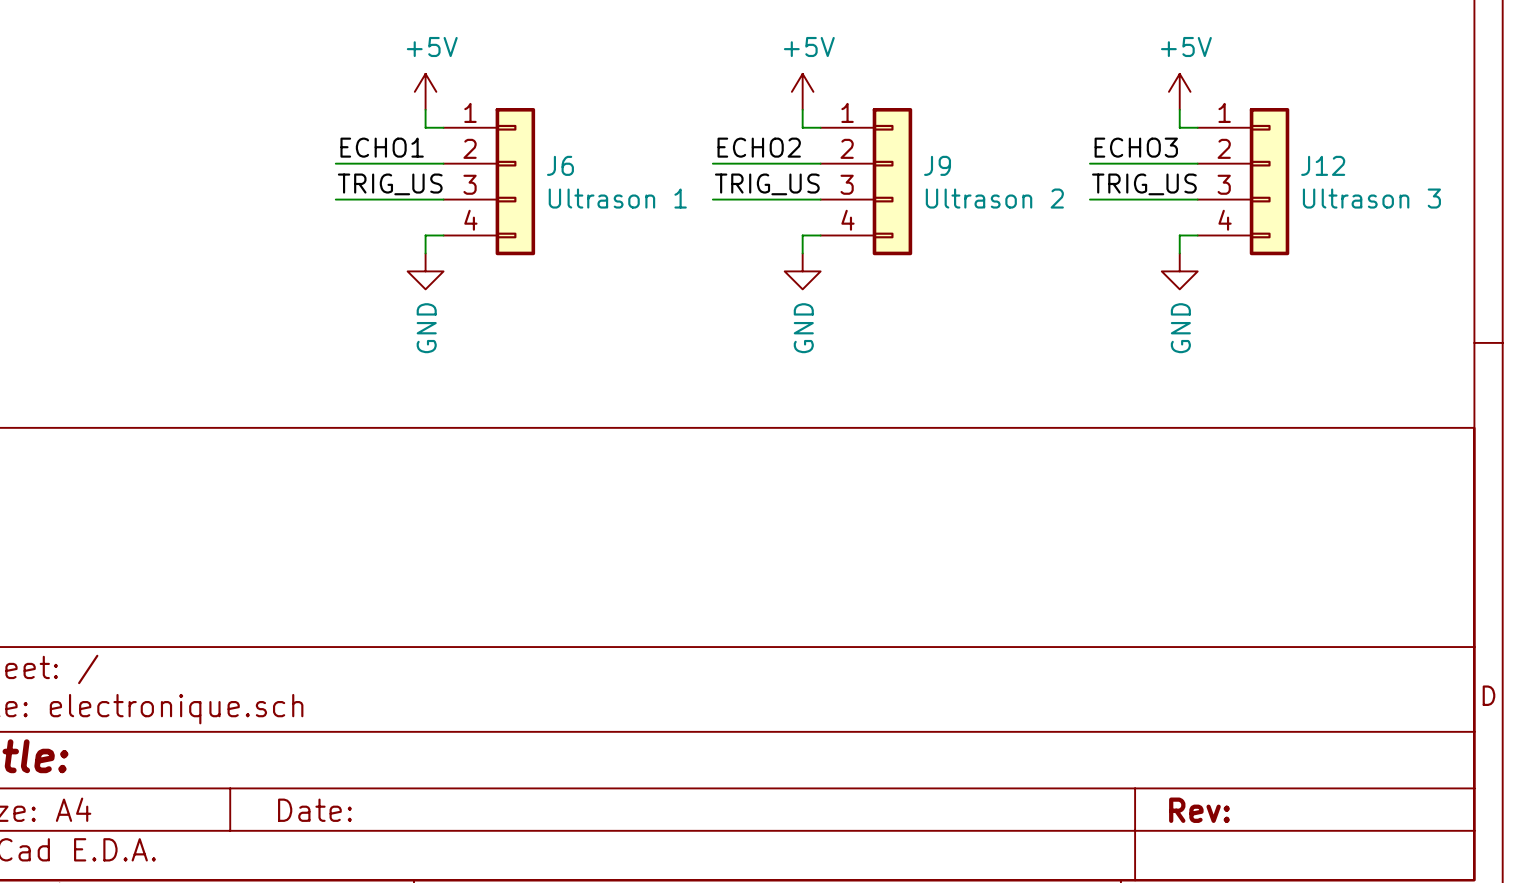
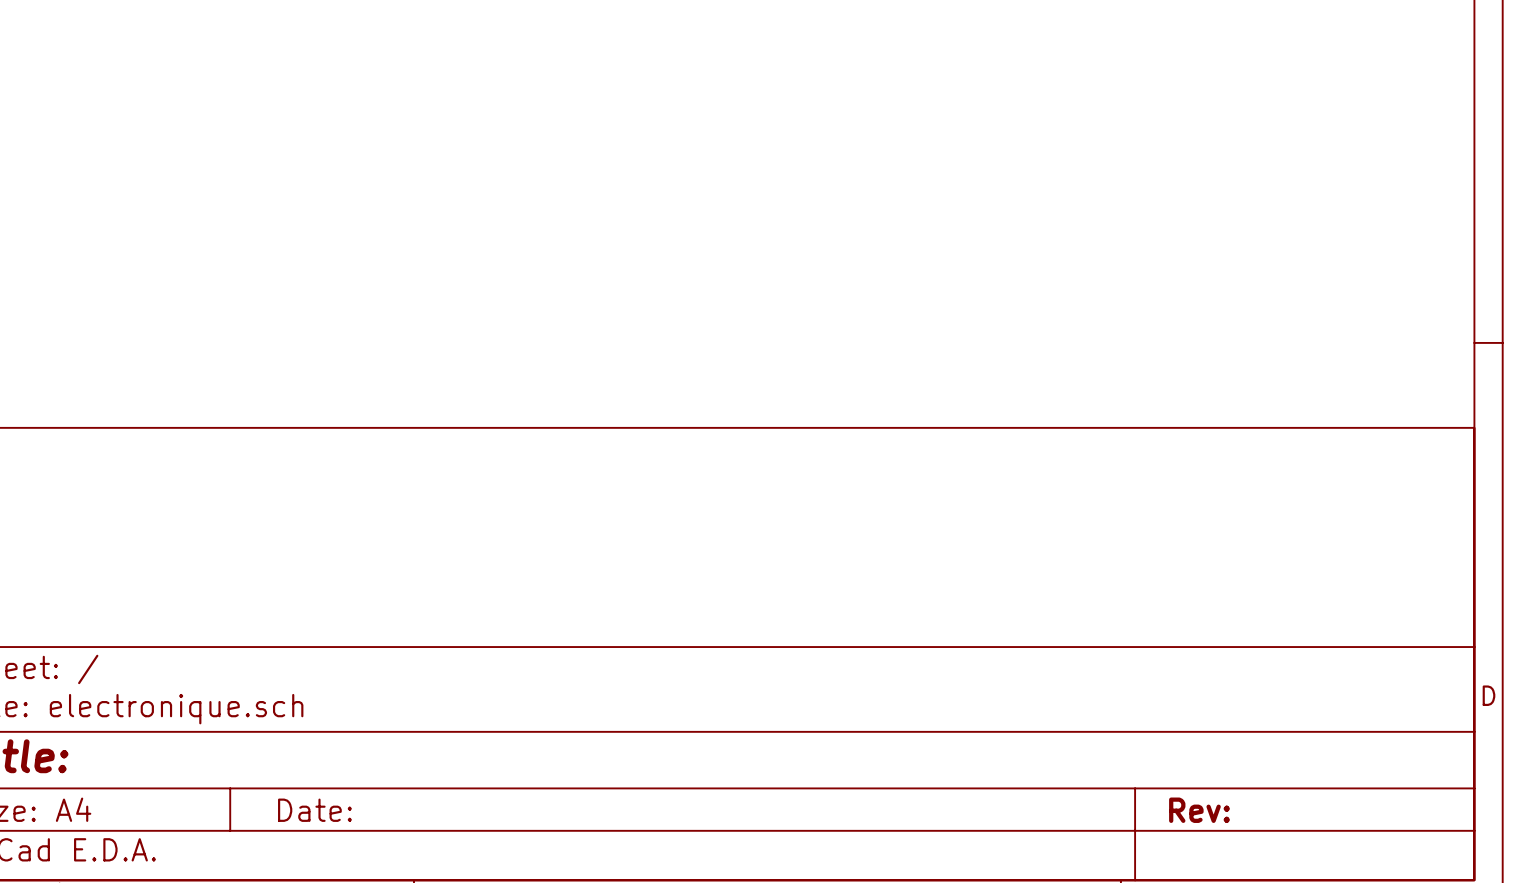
power symbol: +5V (425, 91) -> none
power symbol: +5V (802, 91) -> none
power symbol: +5V (1179, 91) -> none
wire: (425, 109) (425, 127) (443, 127) -> none
wire: (802, 109) (802, 127) (820, 127) -> none
wire: (1179, 109) (1179, 127) (1197, 127) -> none
label: ECHO1 (382, 147) -> none
label: ECHO2 (759, 147) -> none
label: ECHO3 (1136, 147) -> none
wire: (335, 163) (443, 163) -> none
wire: (712, 163) (820, 163) -> none
wire: (1089, 163) (1197, 163) -> none
J6: Ultrason 1 (489, 181) -> none
J9: Ultrason 2 (866, 181) -> none
J12: Ultrason 3 (1243, 181) -> none
label: TRIG_US (390, 184) -> none
label: TRIG_US (767, 184) -> none
label: TRIG_US (1144, 184) -> none
wire: (335, 199) (443, 199) -> none
wire: (712, 199) (820, 199) -> none
wire: (1089, 199) (1197, 199) -> none
wire: (443, 235) (425, 235) (425, 253) -> none
wire: (820, 235) (802, 235) (802, 253) -> none
wire: (1197, 235) (1179, 235) (1179, 253) -> none
power symbol: GND (425, 271) -> none
power symbol: GND (802, 271) -> none
power symbol: GND (1179, 271) -> none

